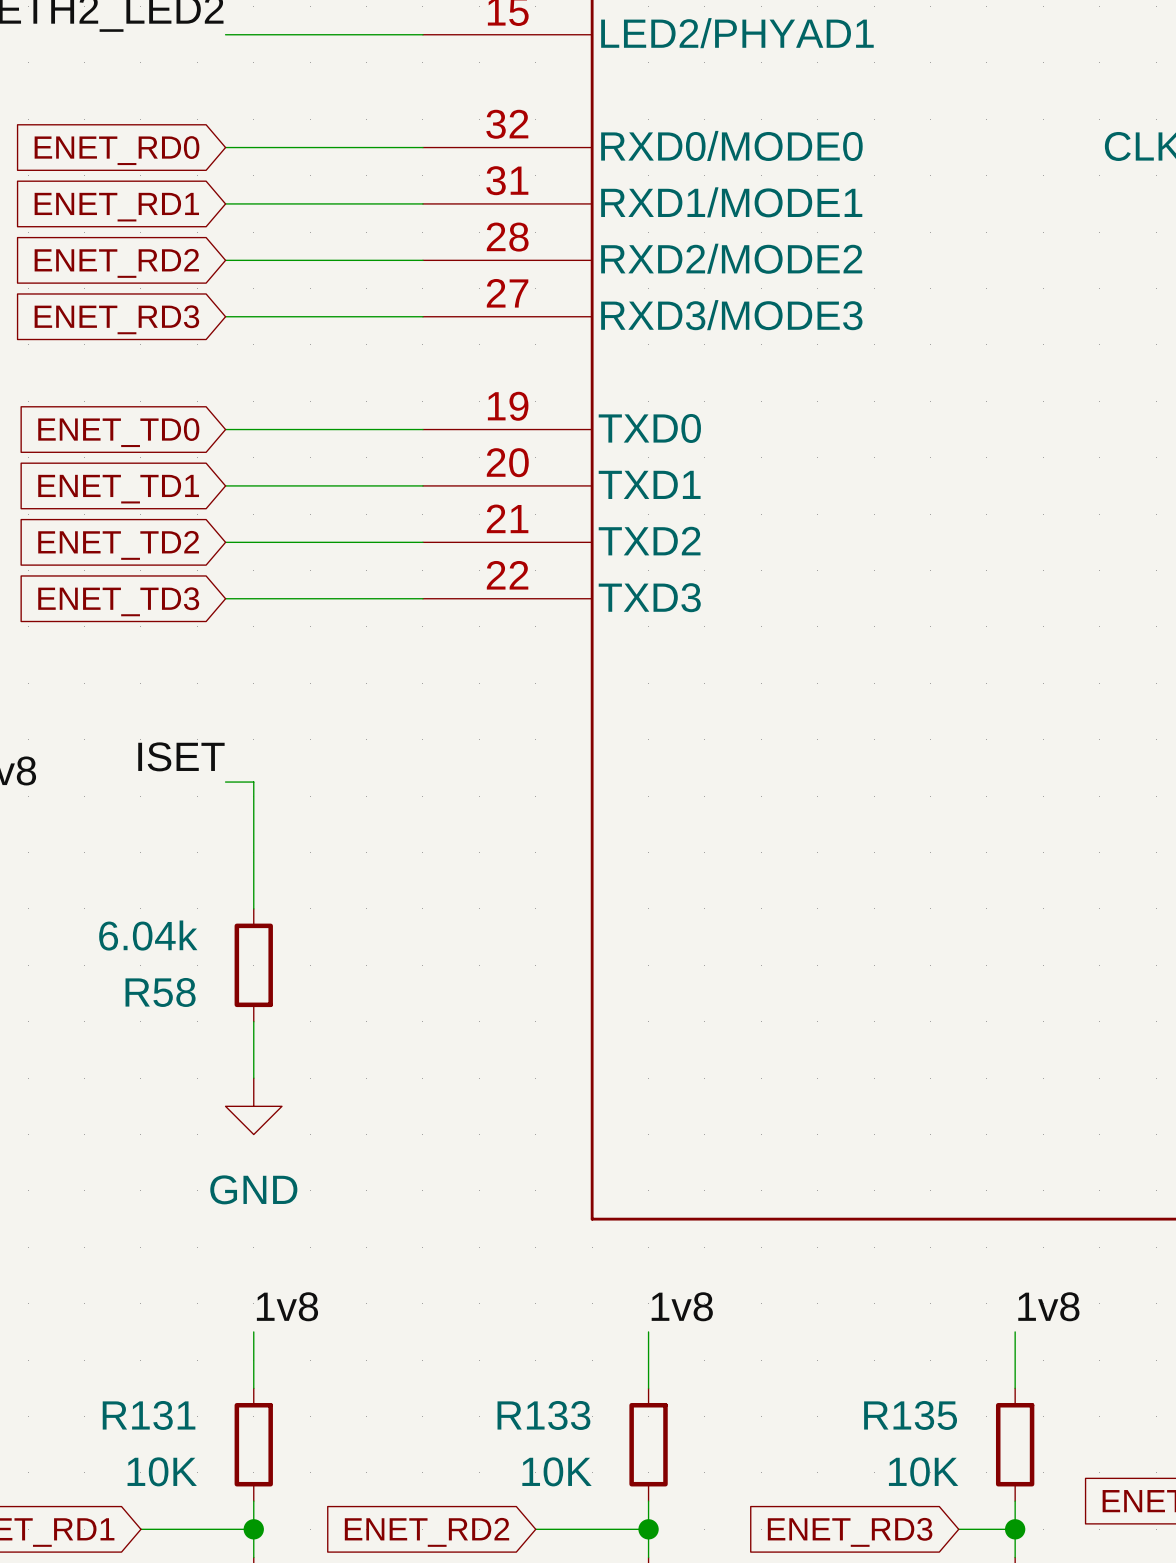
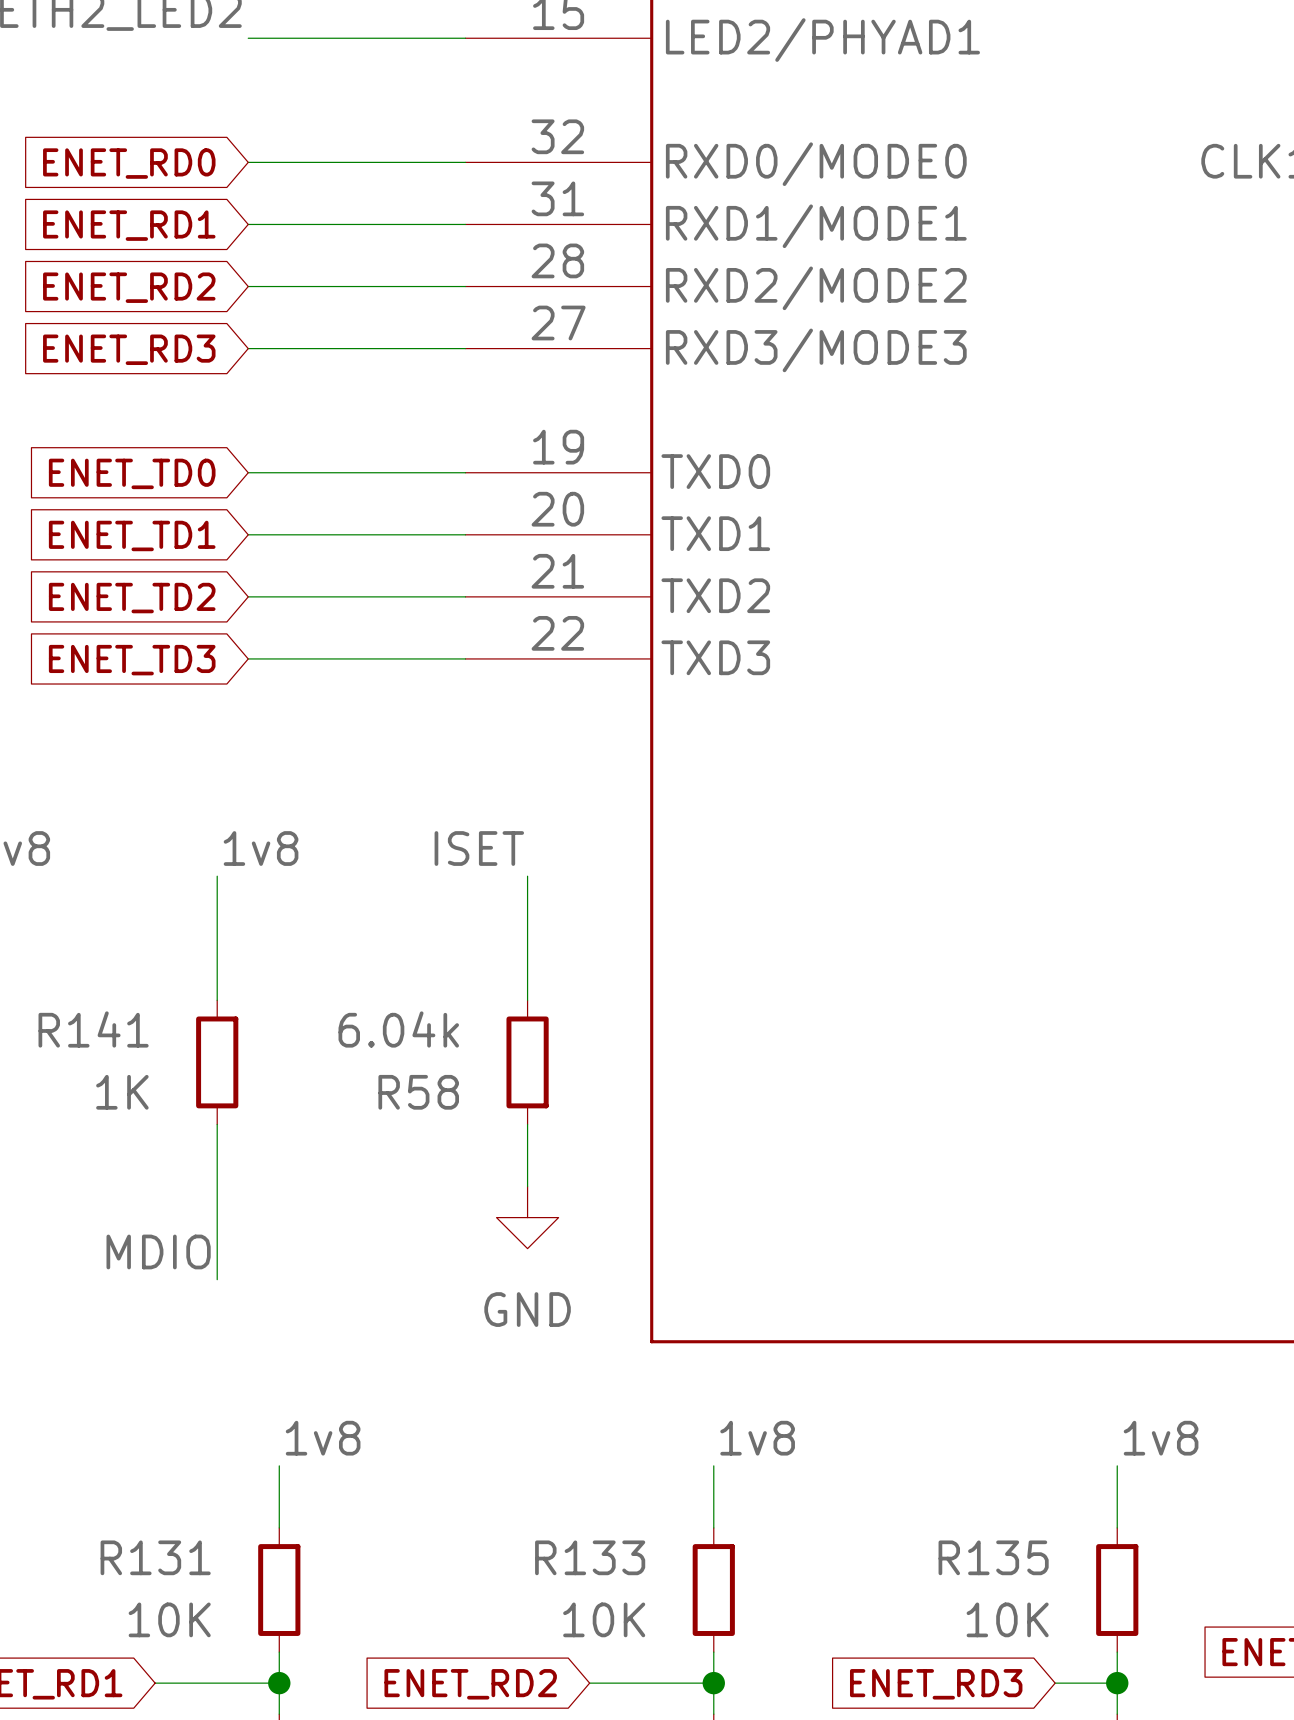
label position: ISET (181, 756) -> ISET (479, 848)
label: none -> 1v8 (261, 848)
wire: (225, 782) (253, 782) (253, 908) -> none
wire: none -> (217, 876) (217, 1000)
wire: none -> (527, 876) (527, 1000)
R141: none -> 1K (217, 1062)
R58 position: (253, 965) -> (527, 1062)
wire: none -> (217, 1124) (217, 1279)
wire: (253, 1021) (253, 1078) -> (527, 1124) (527, 1186)
power symbol position: GND (253, 1106) -> GND (527, 1217)
label: none -> MDIO (158, 1251)

